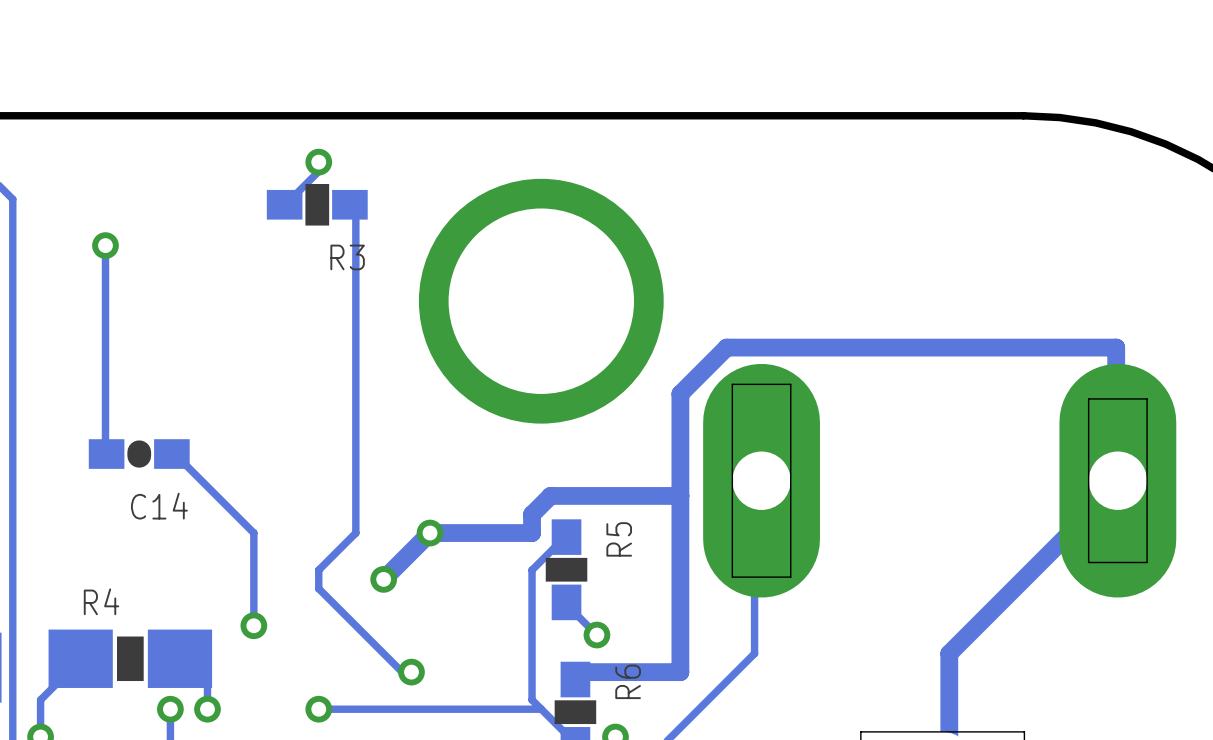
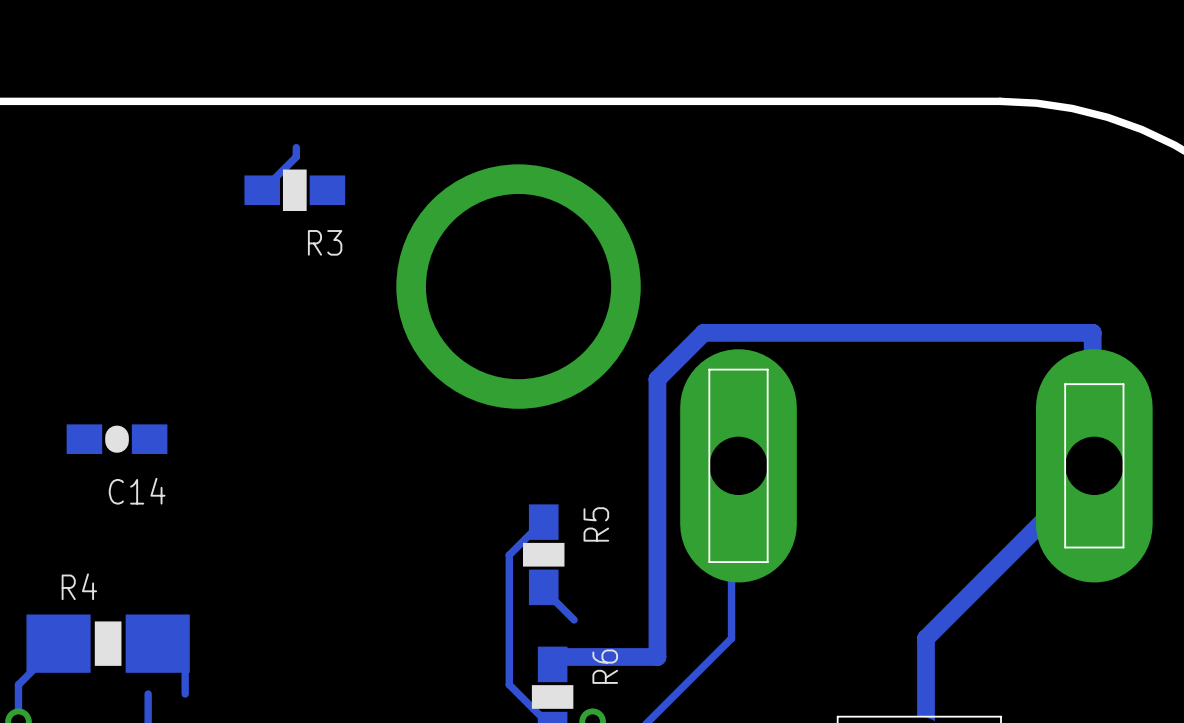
via: (318, 162) -> none
track: (349, 204) (355, 208) (355, 533) (318, 570) (318, 588) (402, 672) (411, 672) -> none
track: (105, 245) (106, 454) -> none
via: (105, 245) -> none
track: (171, 454) (179, 458) (253, 533) (253, 625) -> none
track: (680, 495) (550, 495) (532, 514) (532, 533) (430, 533) (383, 579) -> none
via: (430, 533) -> none
via: (383, 579) -> none
via: (253, 625) -> none
via: (596, 635) -> none
via: (411, 672) -> none
via: (170, 709) -> none
via: (207, 709) -> none
via: (318, 709) -> none
track: (541, 709) (318, 709) -> none

